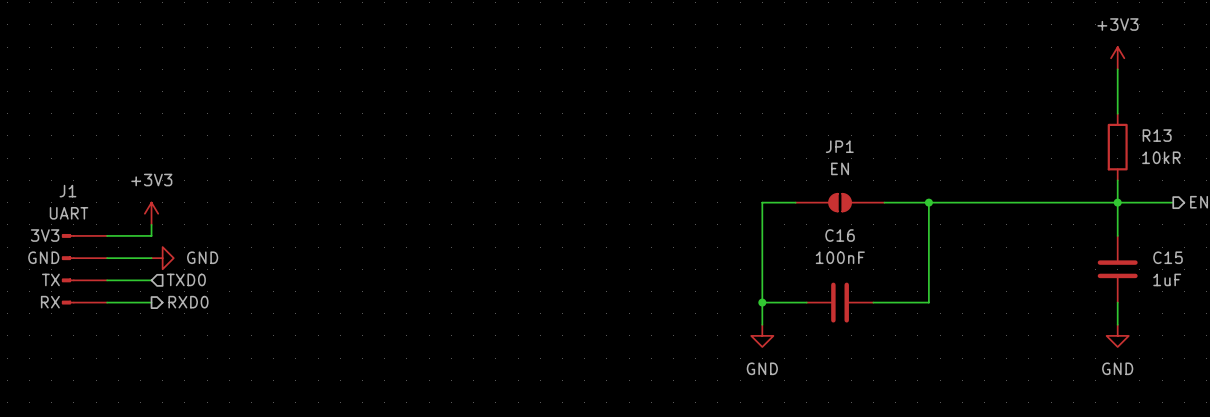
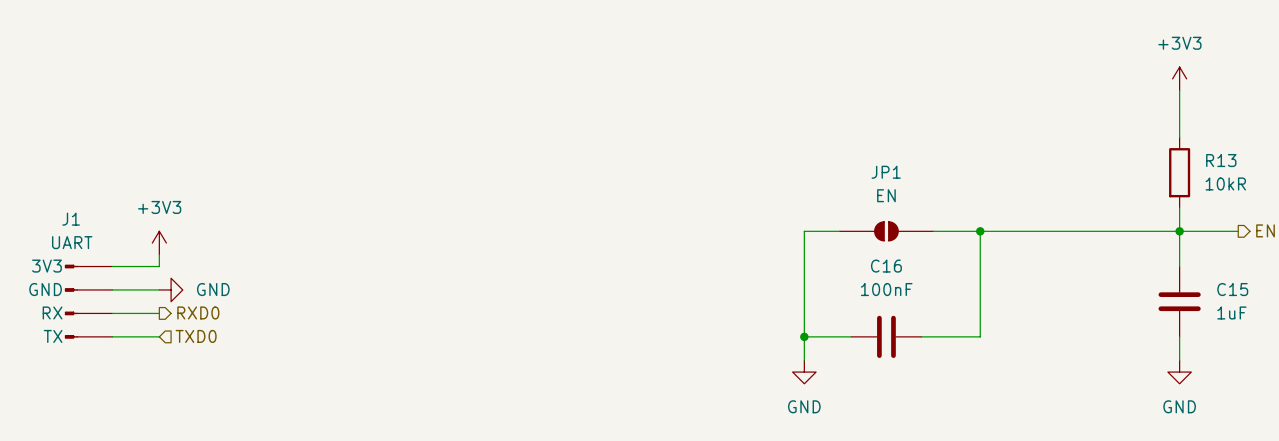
J1 pin name: TX (50, 279) -> RX (52, 312)
hierarchical label shape: input (186, 279) -> output (198, 312)
hierarchical label: TXD0 (186, 279) -> RXD0 (198, 312)
J1 pin name: RX (50, 302) -> TX (53, 336)
hierarchical label shape: output (188, 302) -> input (196, 336)
hierarchical label: RXD0 (188, 302) -> TXD0 (196, 336)

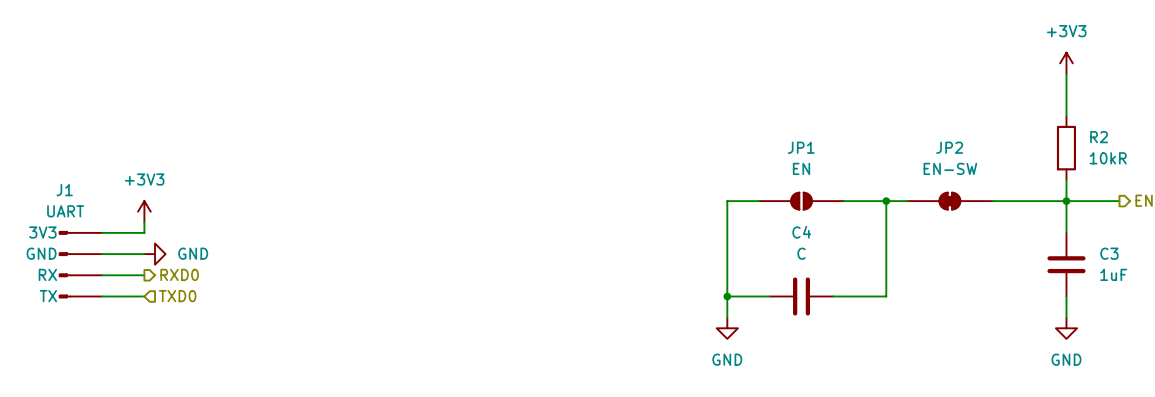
R13 name: R13 (1221, 160) -> R2 (1099, 137)
JP2: none -> EN-SW (949, 201)
C16 name: C16 (886, 266) -> C4 (801, 232)
C16 value: 100nF (886, 289) -> C (801, 253)
C15 name: C15 (1232, 289) -> C3 (1109, 253)

